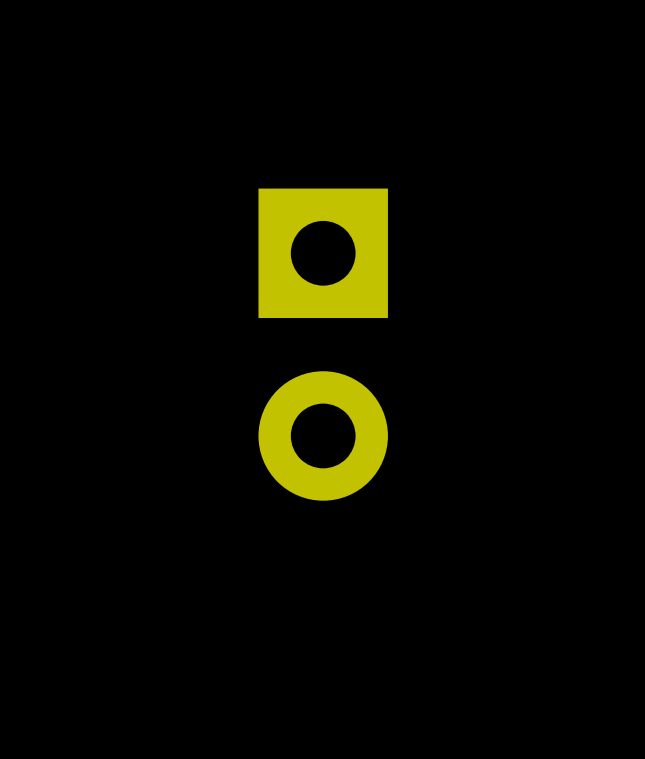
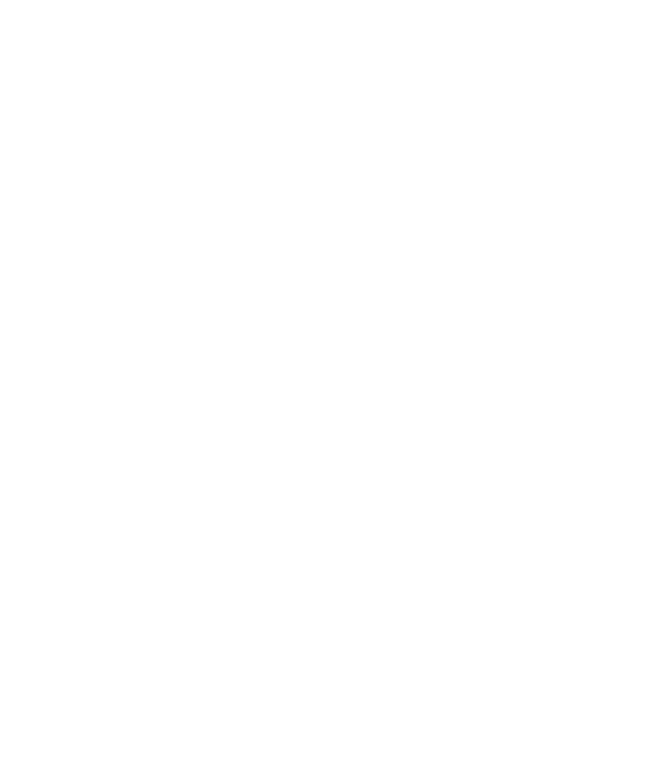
part: (323, 344) -> none

